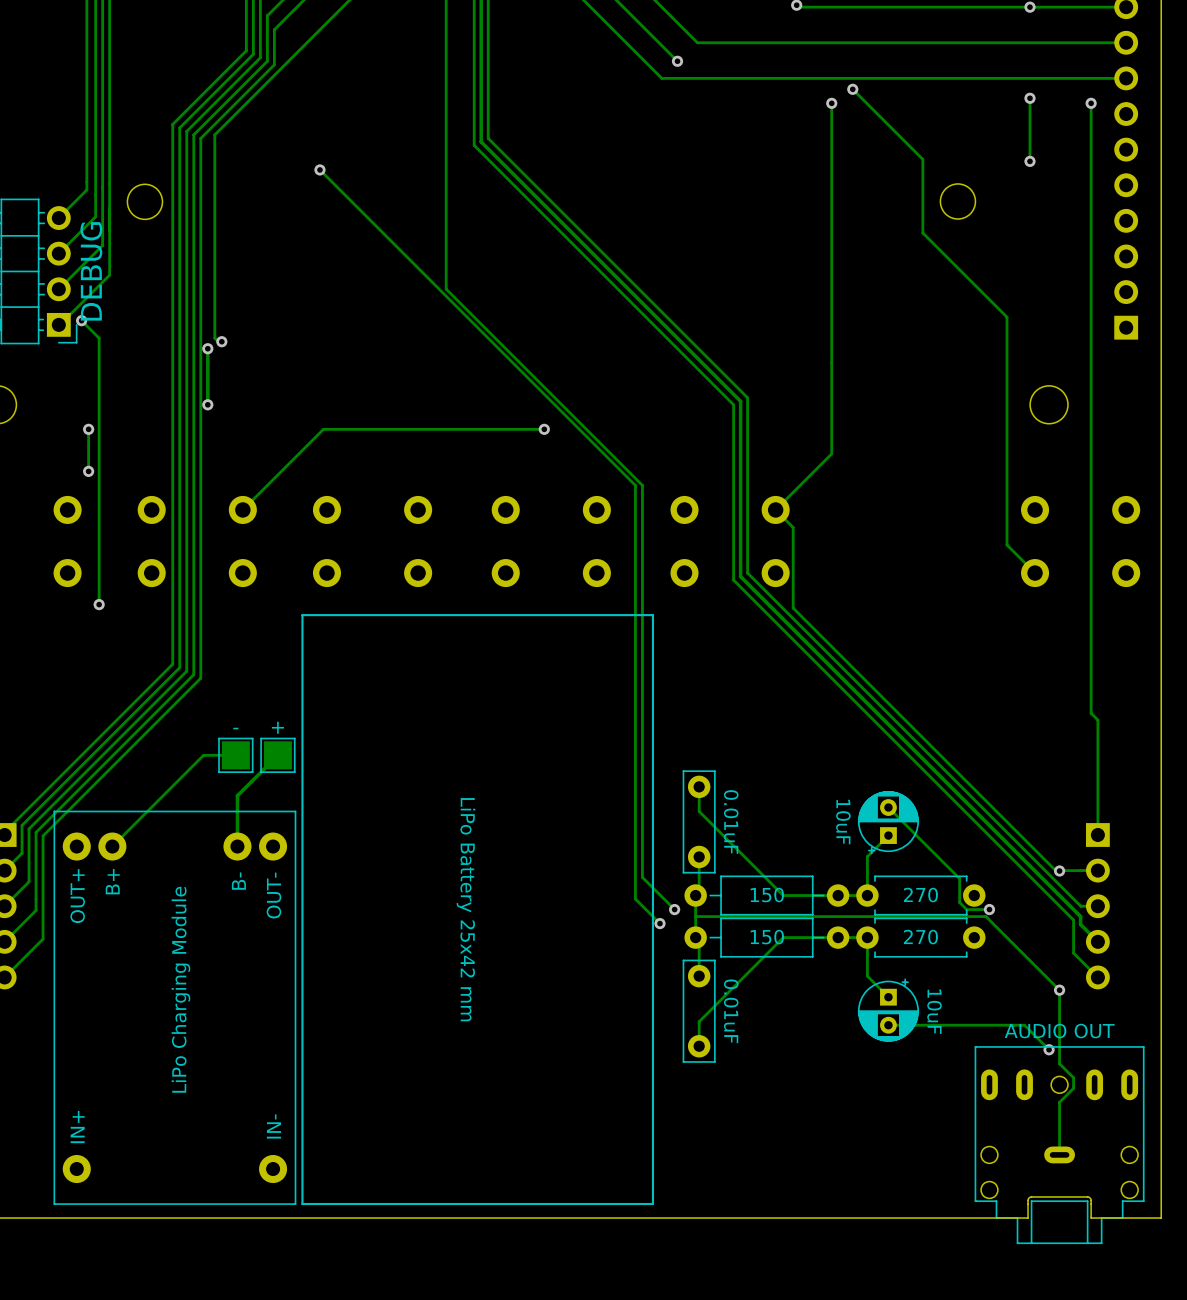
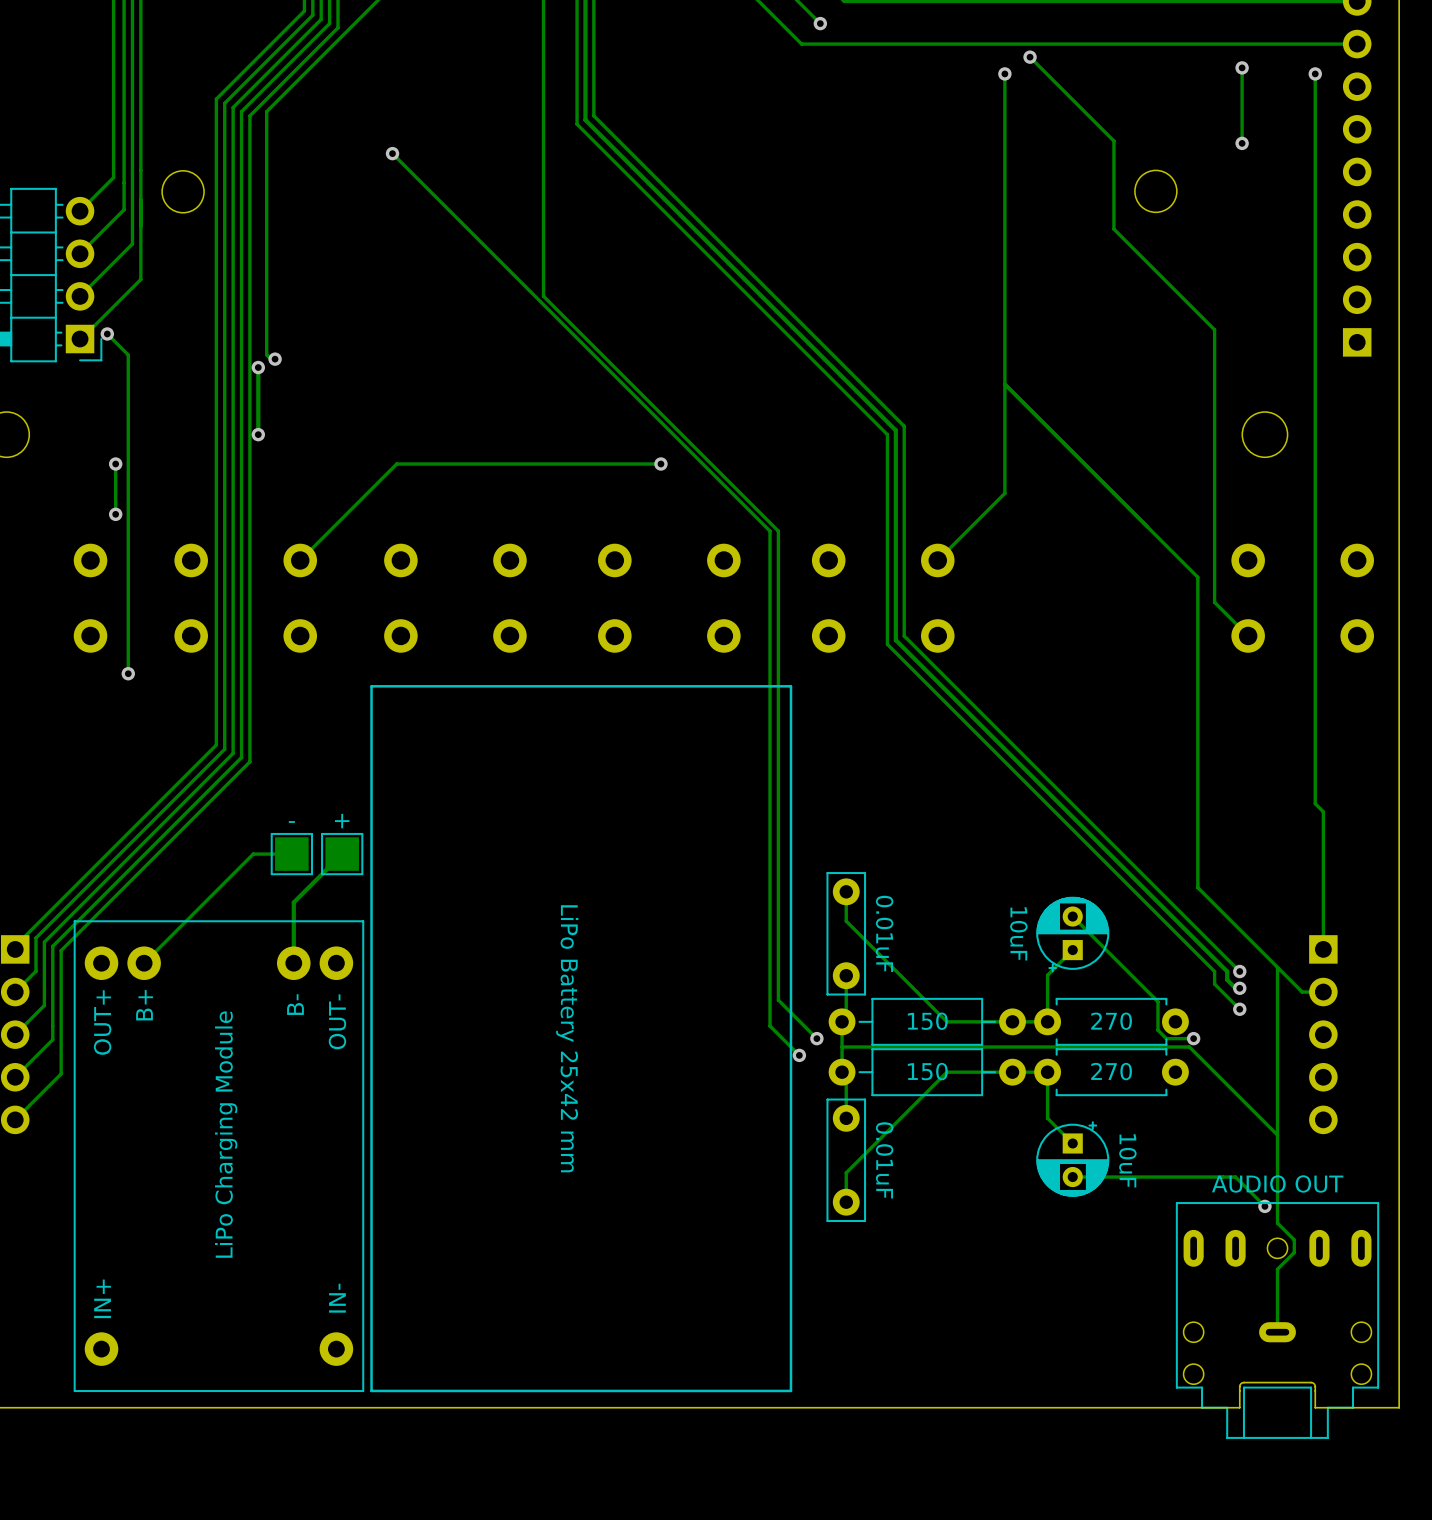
text: DEBUG (91, 271) -> none
track: (775, 509) (793, 527) (793, 608) (1055, 870) (1080, 870) -> (1004, 384) (1197, 577) (1197, 887) (1302, 992)
track: none -> (1277, 967) (1277, 1135)
track: (1007, 853) (1073, 920) (1073, 953) (1097, 977) -> (1214, 971) (1214, 984) (1239, 1009)
track: (1017, 853) (1080, 916) (1080, 924) (1097, 941) -> (1227, 971) (1227, 979) (1235, 988) (1239, 988)
track: (1028, 853) (1080, 906) (1097, 906) -> none
via: none -> (1239, 971)
via: none -> (1239, 988)
via: (1059, 871) -> none
via: none -> (1239, 1009)
via: (1059, 990) -> none

